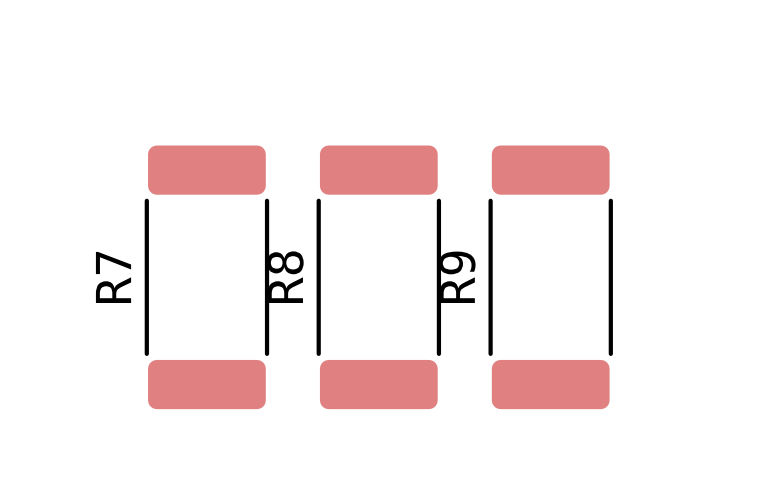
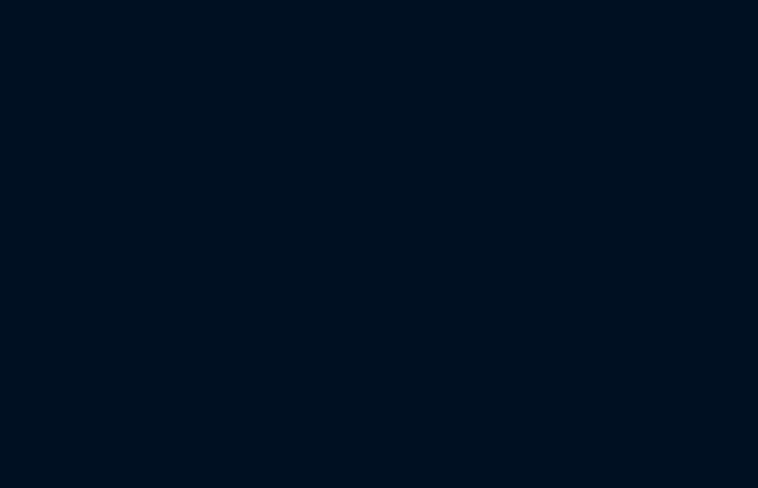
R7: (206, 277) -> none
R8: (378, 277) -> none
R9: (550, 277) -> none

